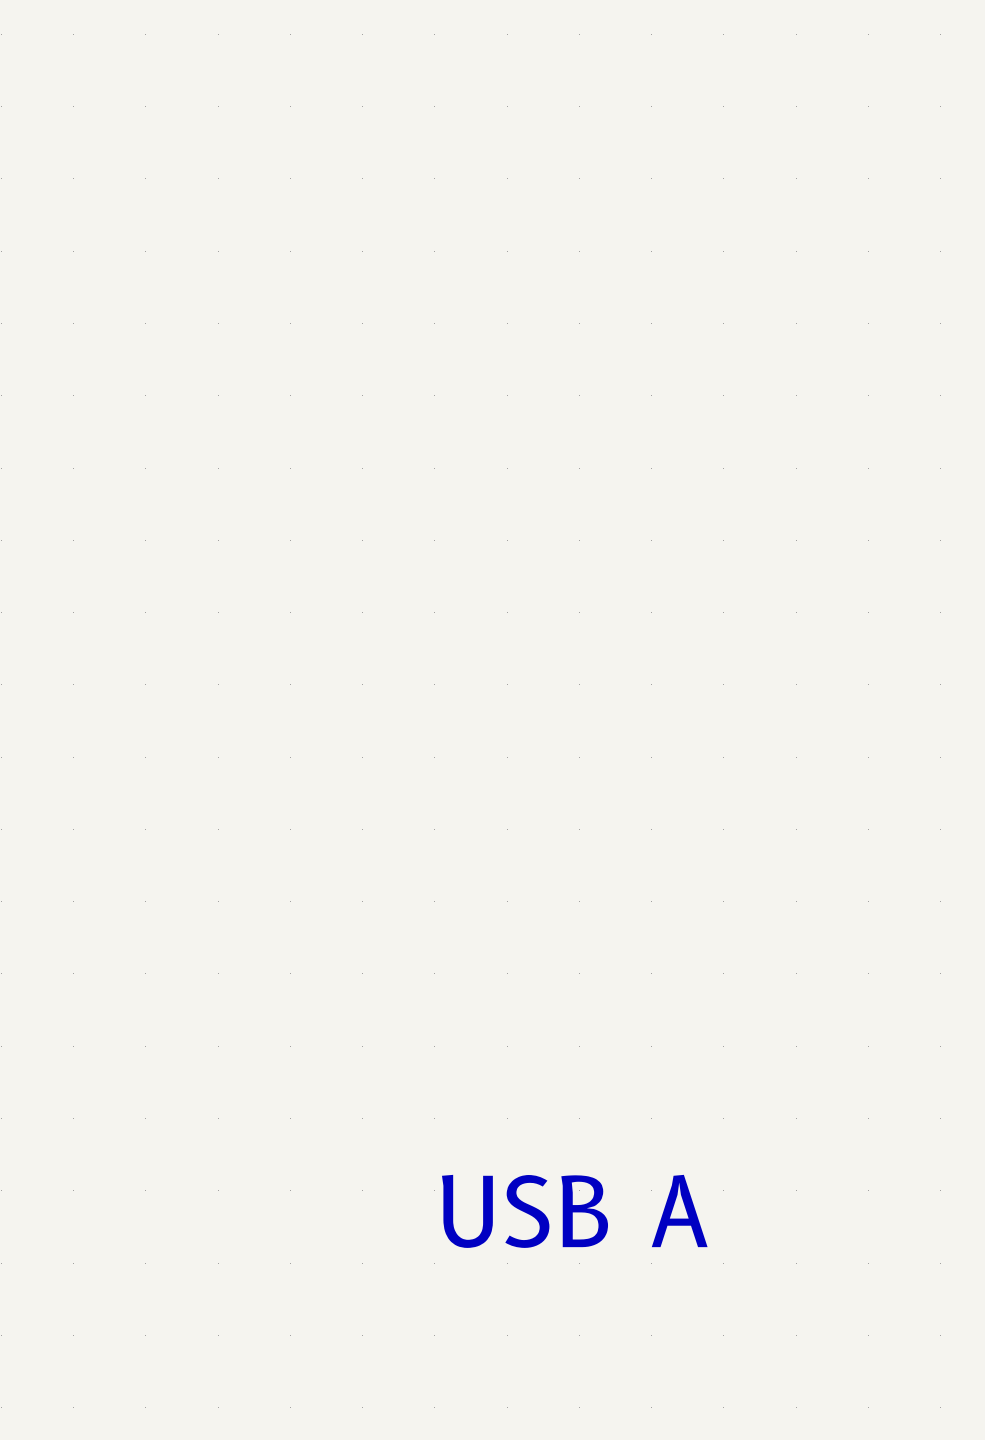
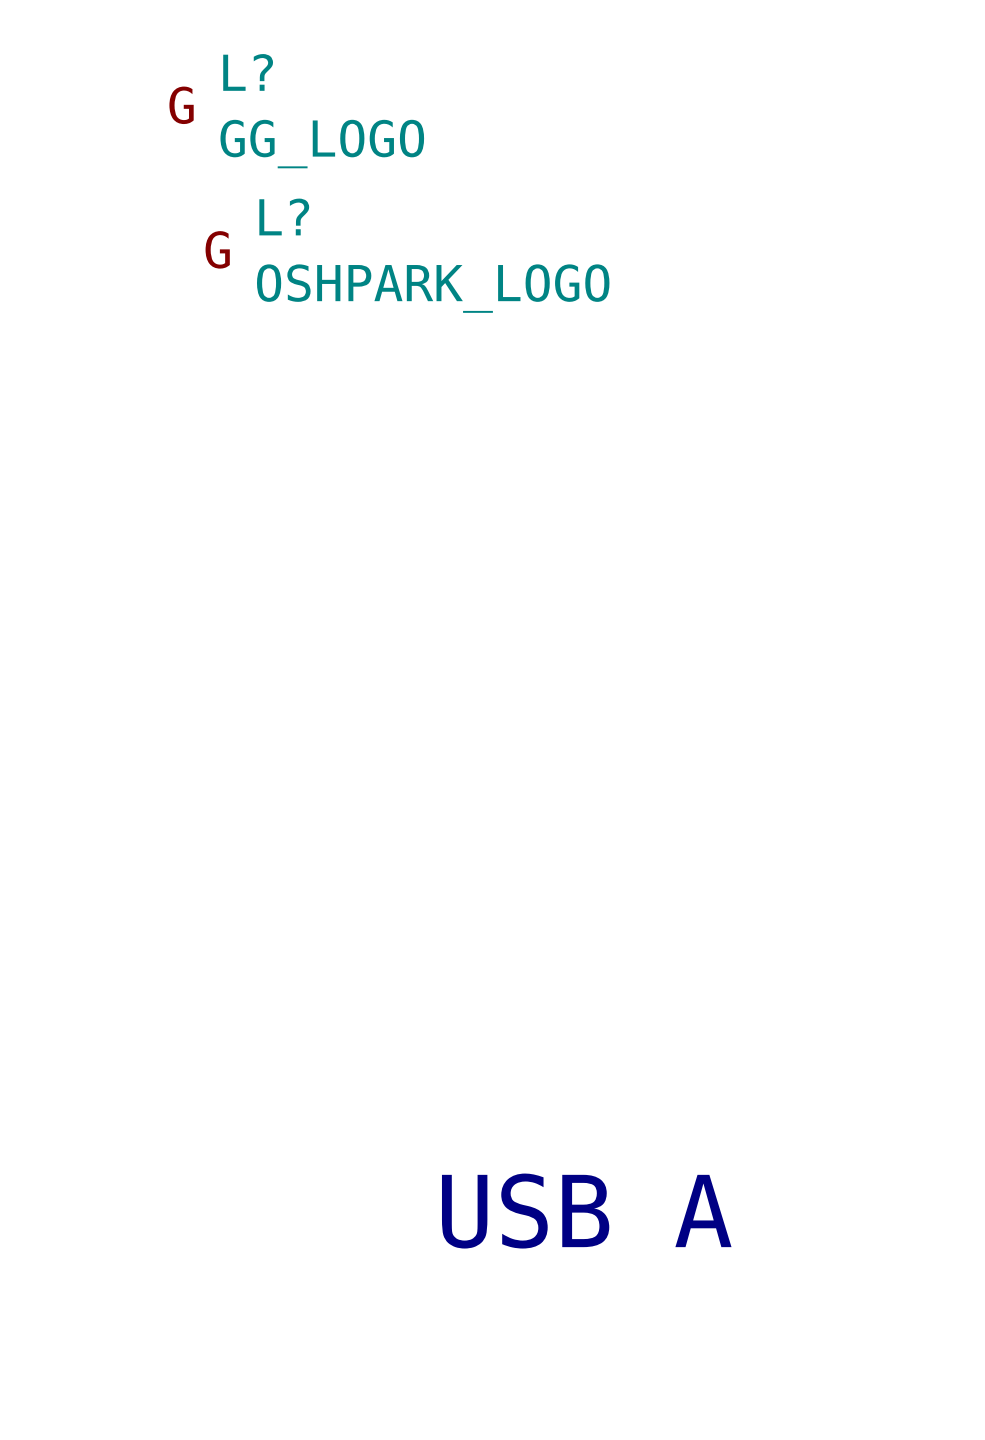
L?: none -> GG_LOGO (296, 111)
L?: none -> OSHPARK_LOGO (407, 255)

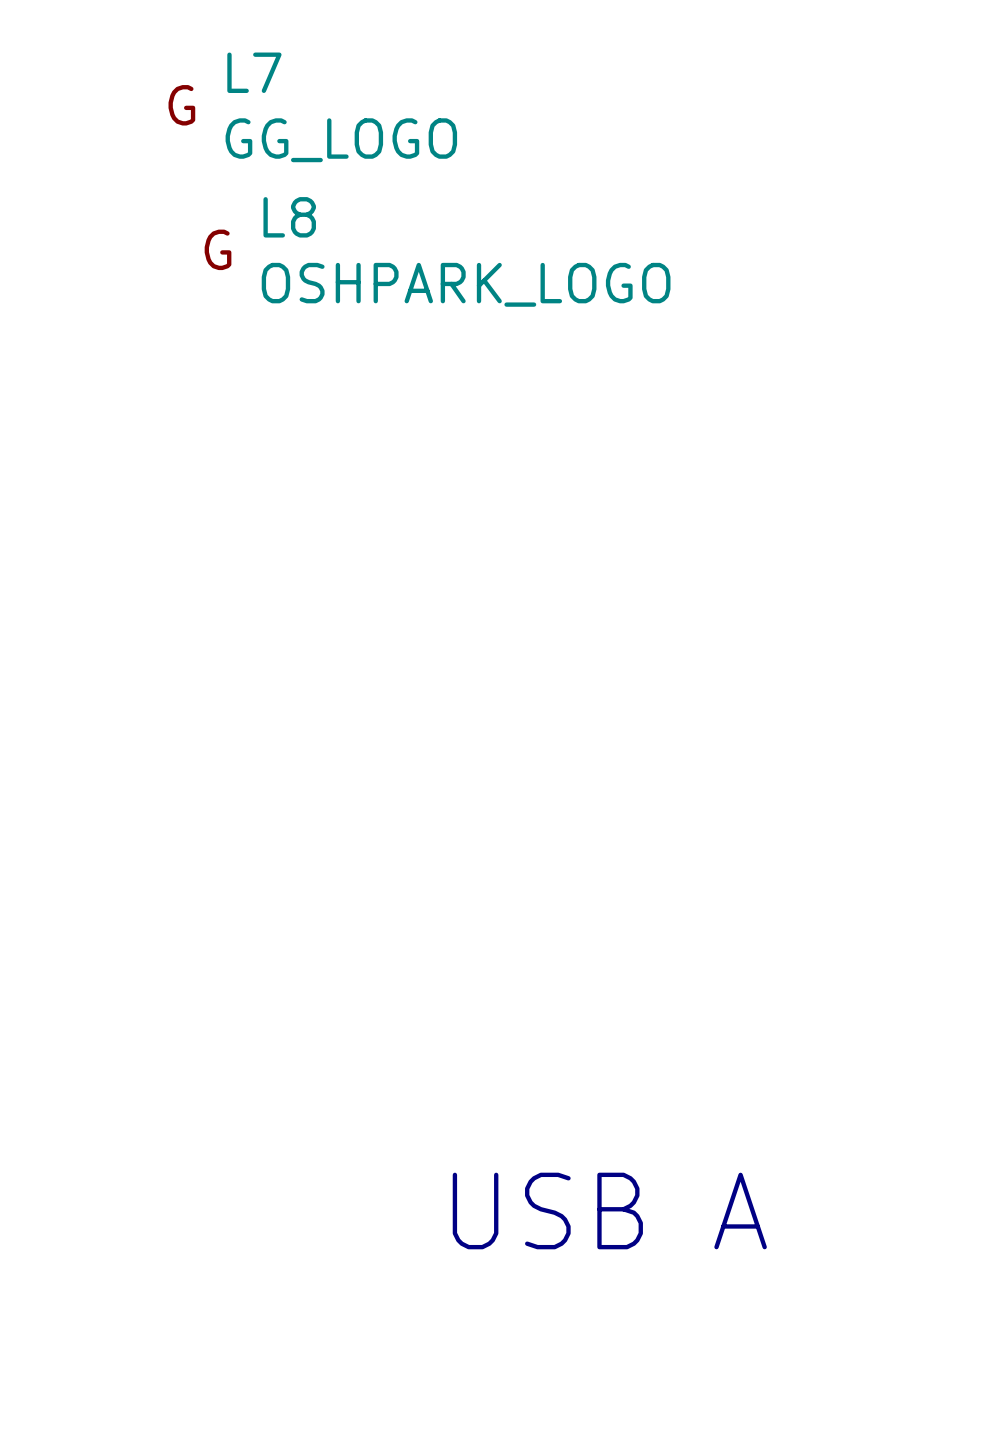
L? name: L? (248, 72) -> L7 (254, 72)
L? name: L? (284, 216) -> L8 (289, 217)

